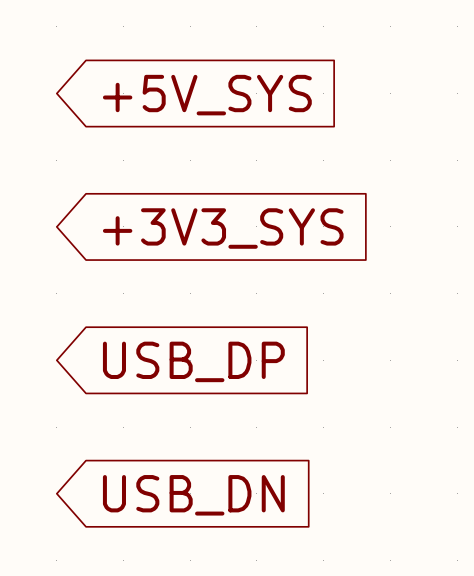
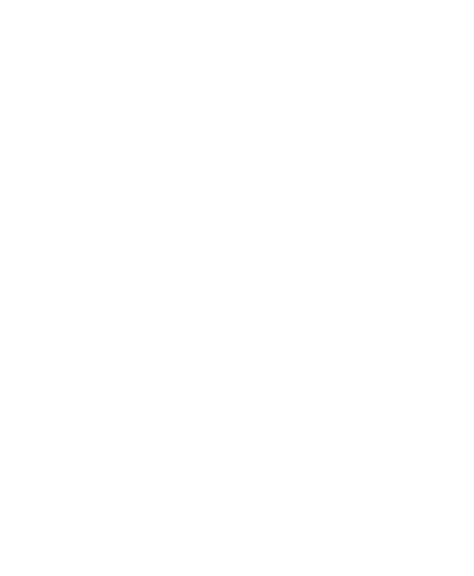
global label: +5V_SYS (207, 95) -> none
global label: +3V3_SYS (223, 228) -> none
global label: USB_DP (193, 361) -> none
global label: USB_DN (193, 495) -> none

